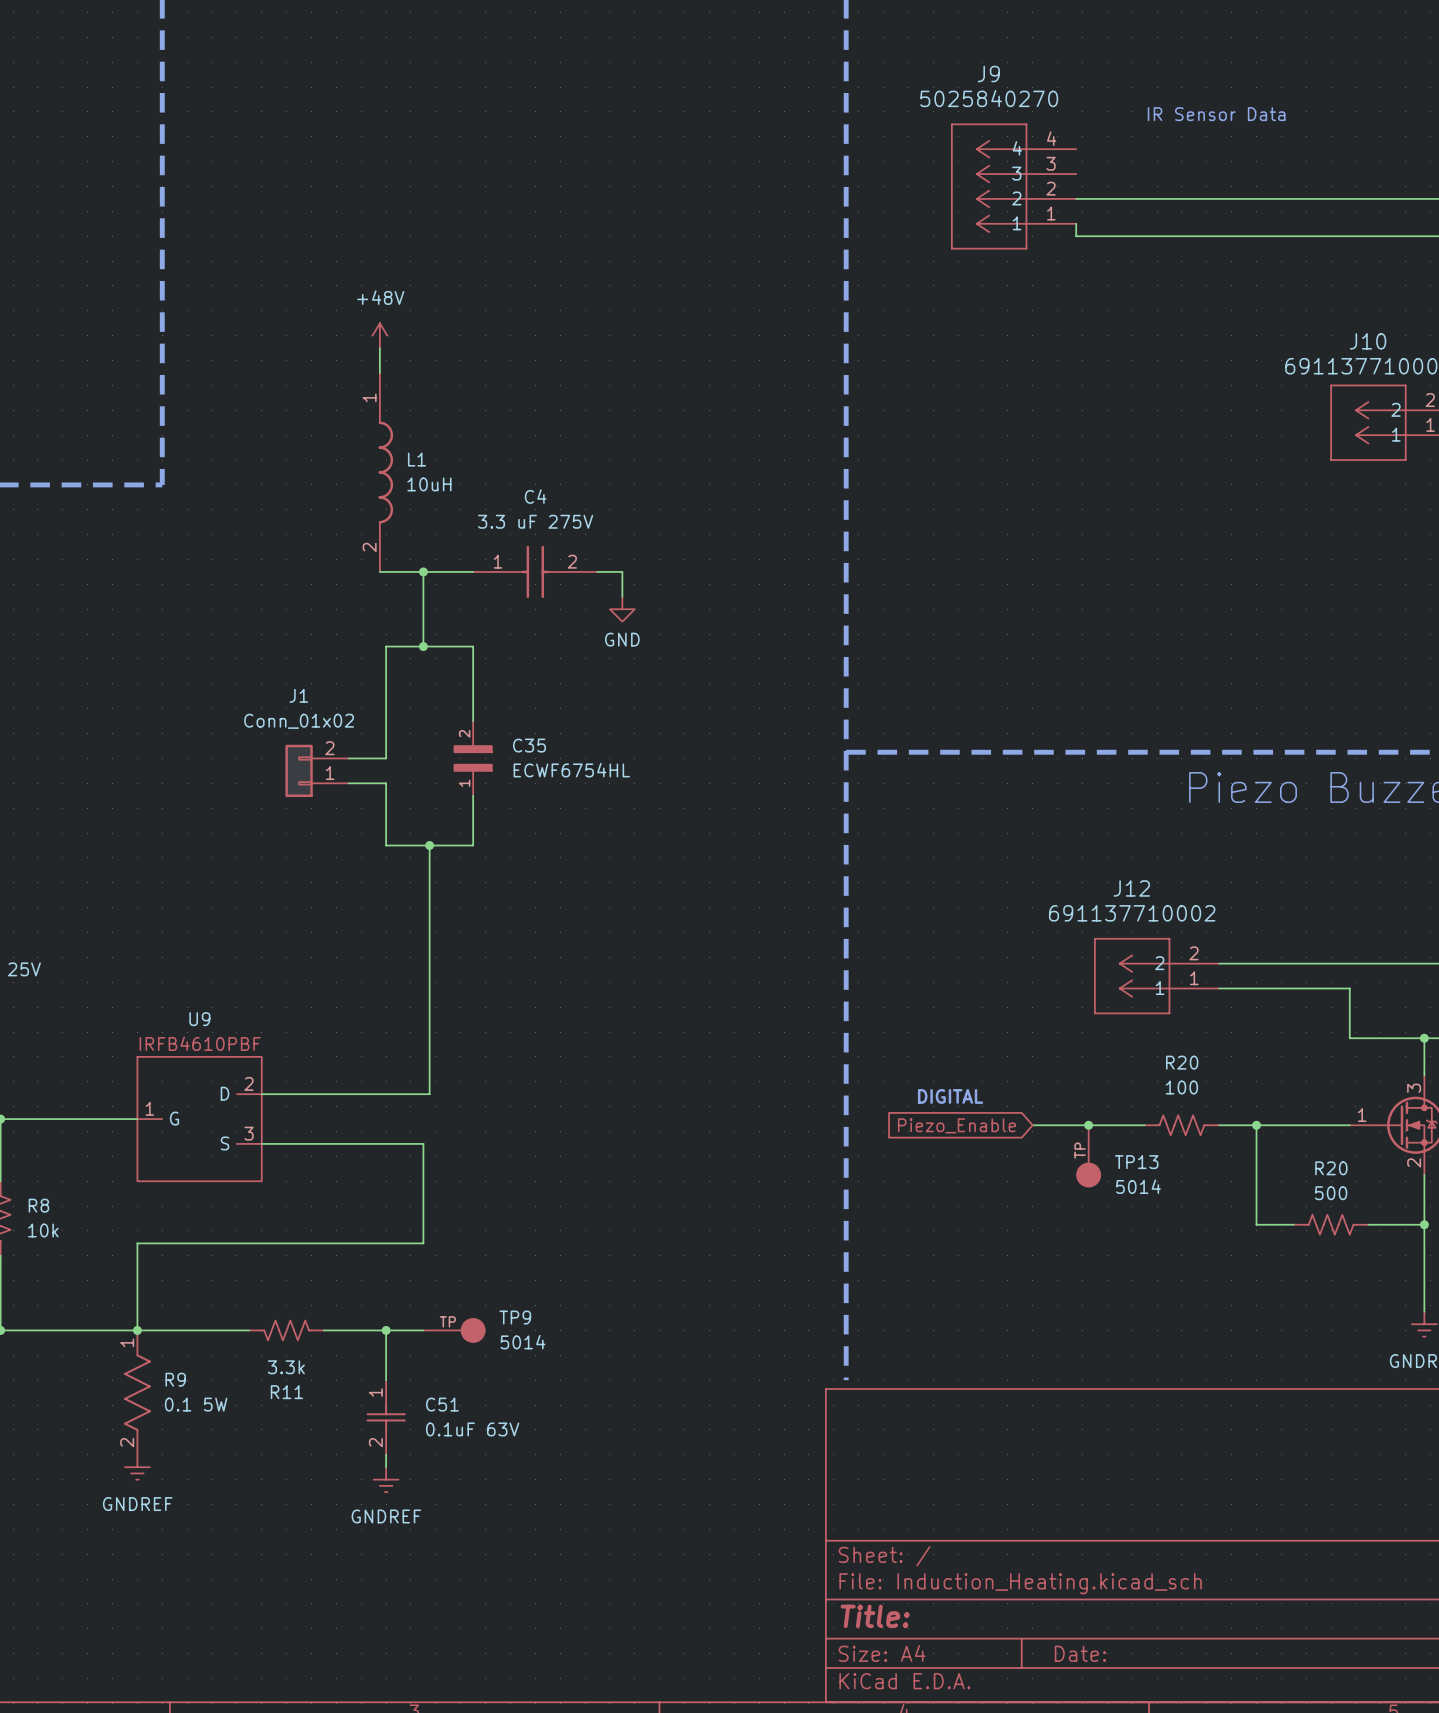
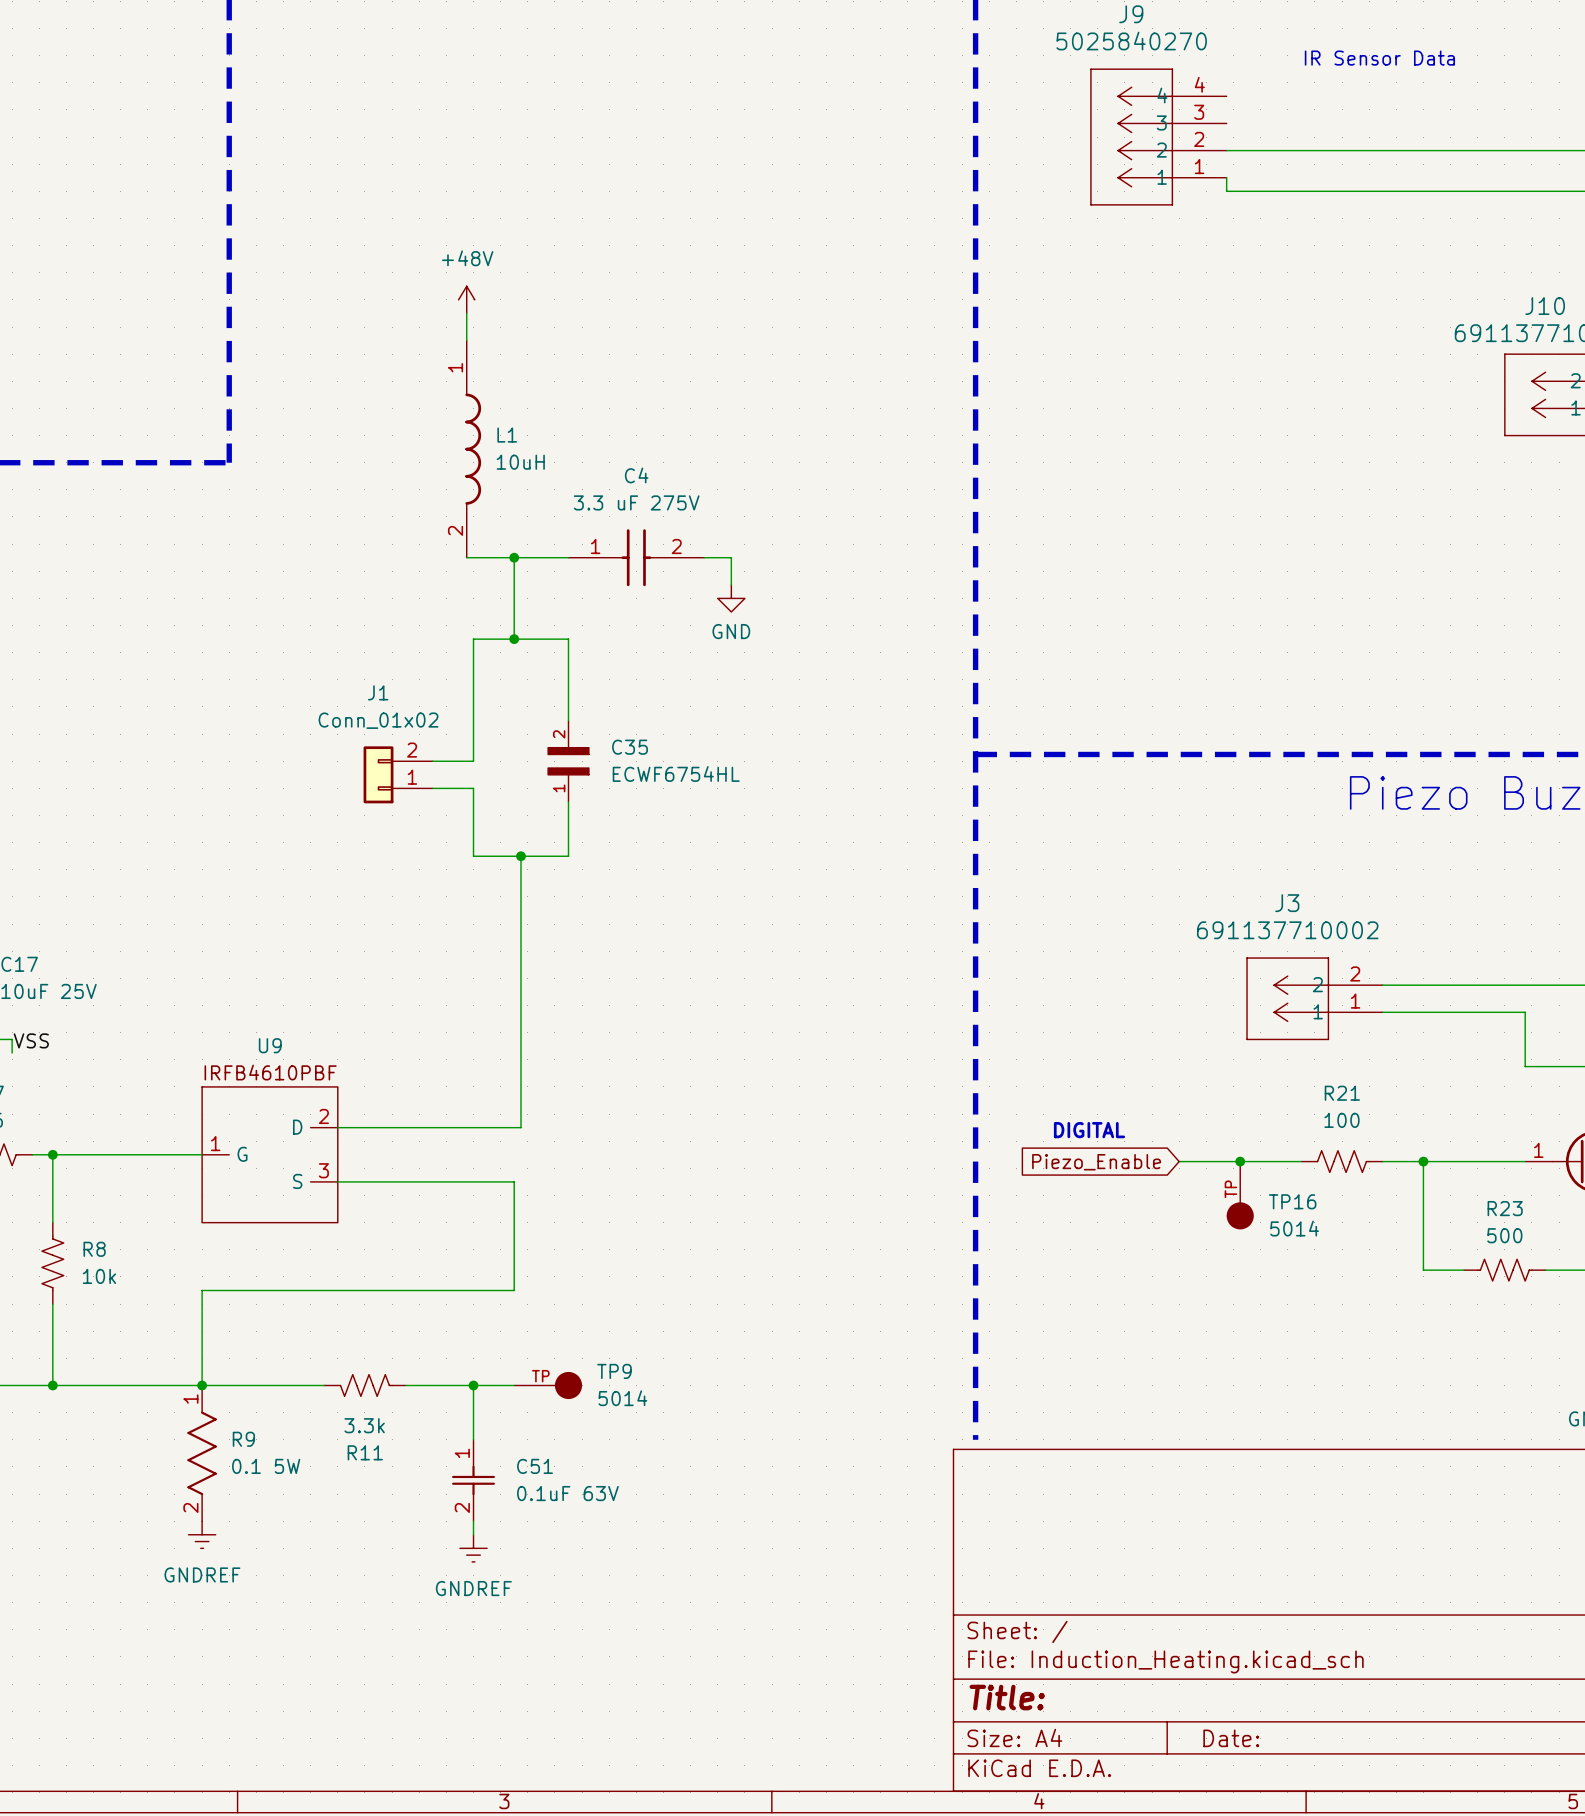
J12 name: J12 (1131, 888) -> J3 (1287, 903)
R20 name: R20 (1182, 1062) -> R21 (1342, 1093)
TP13 name: TP13 (1136, 1162) -> TP16 (1292, 1201)
R20 name: R20 (1331, 1168) -> R23 (1505, 1208)

